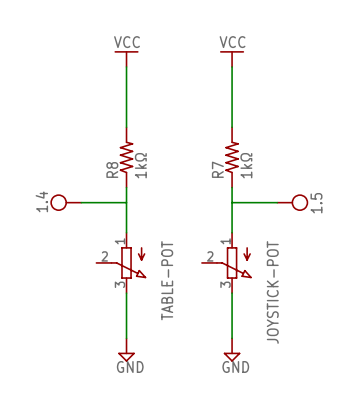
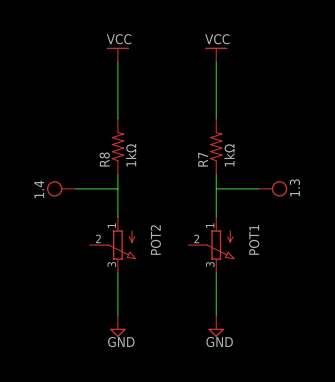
power symbol: 1.5 (292, 202) -> 1.3 (272, 188)
TABLE-POT name: TABLE-POT (167, 280) -> POT2 (155, 240)
JOYSTICK-POT name: JOYSTICK-POT (272, 292) -> POT1 (254, 239)

